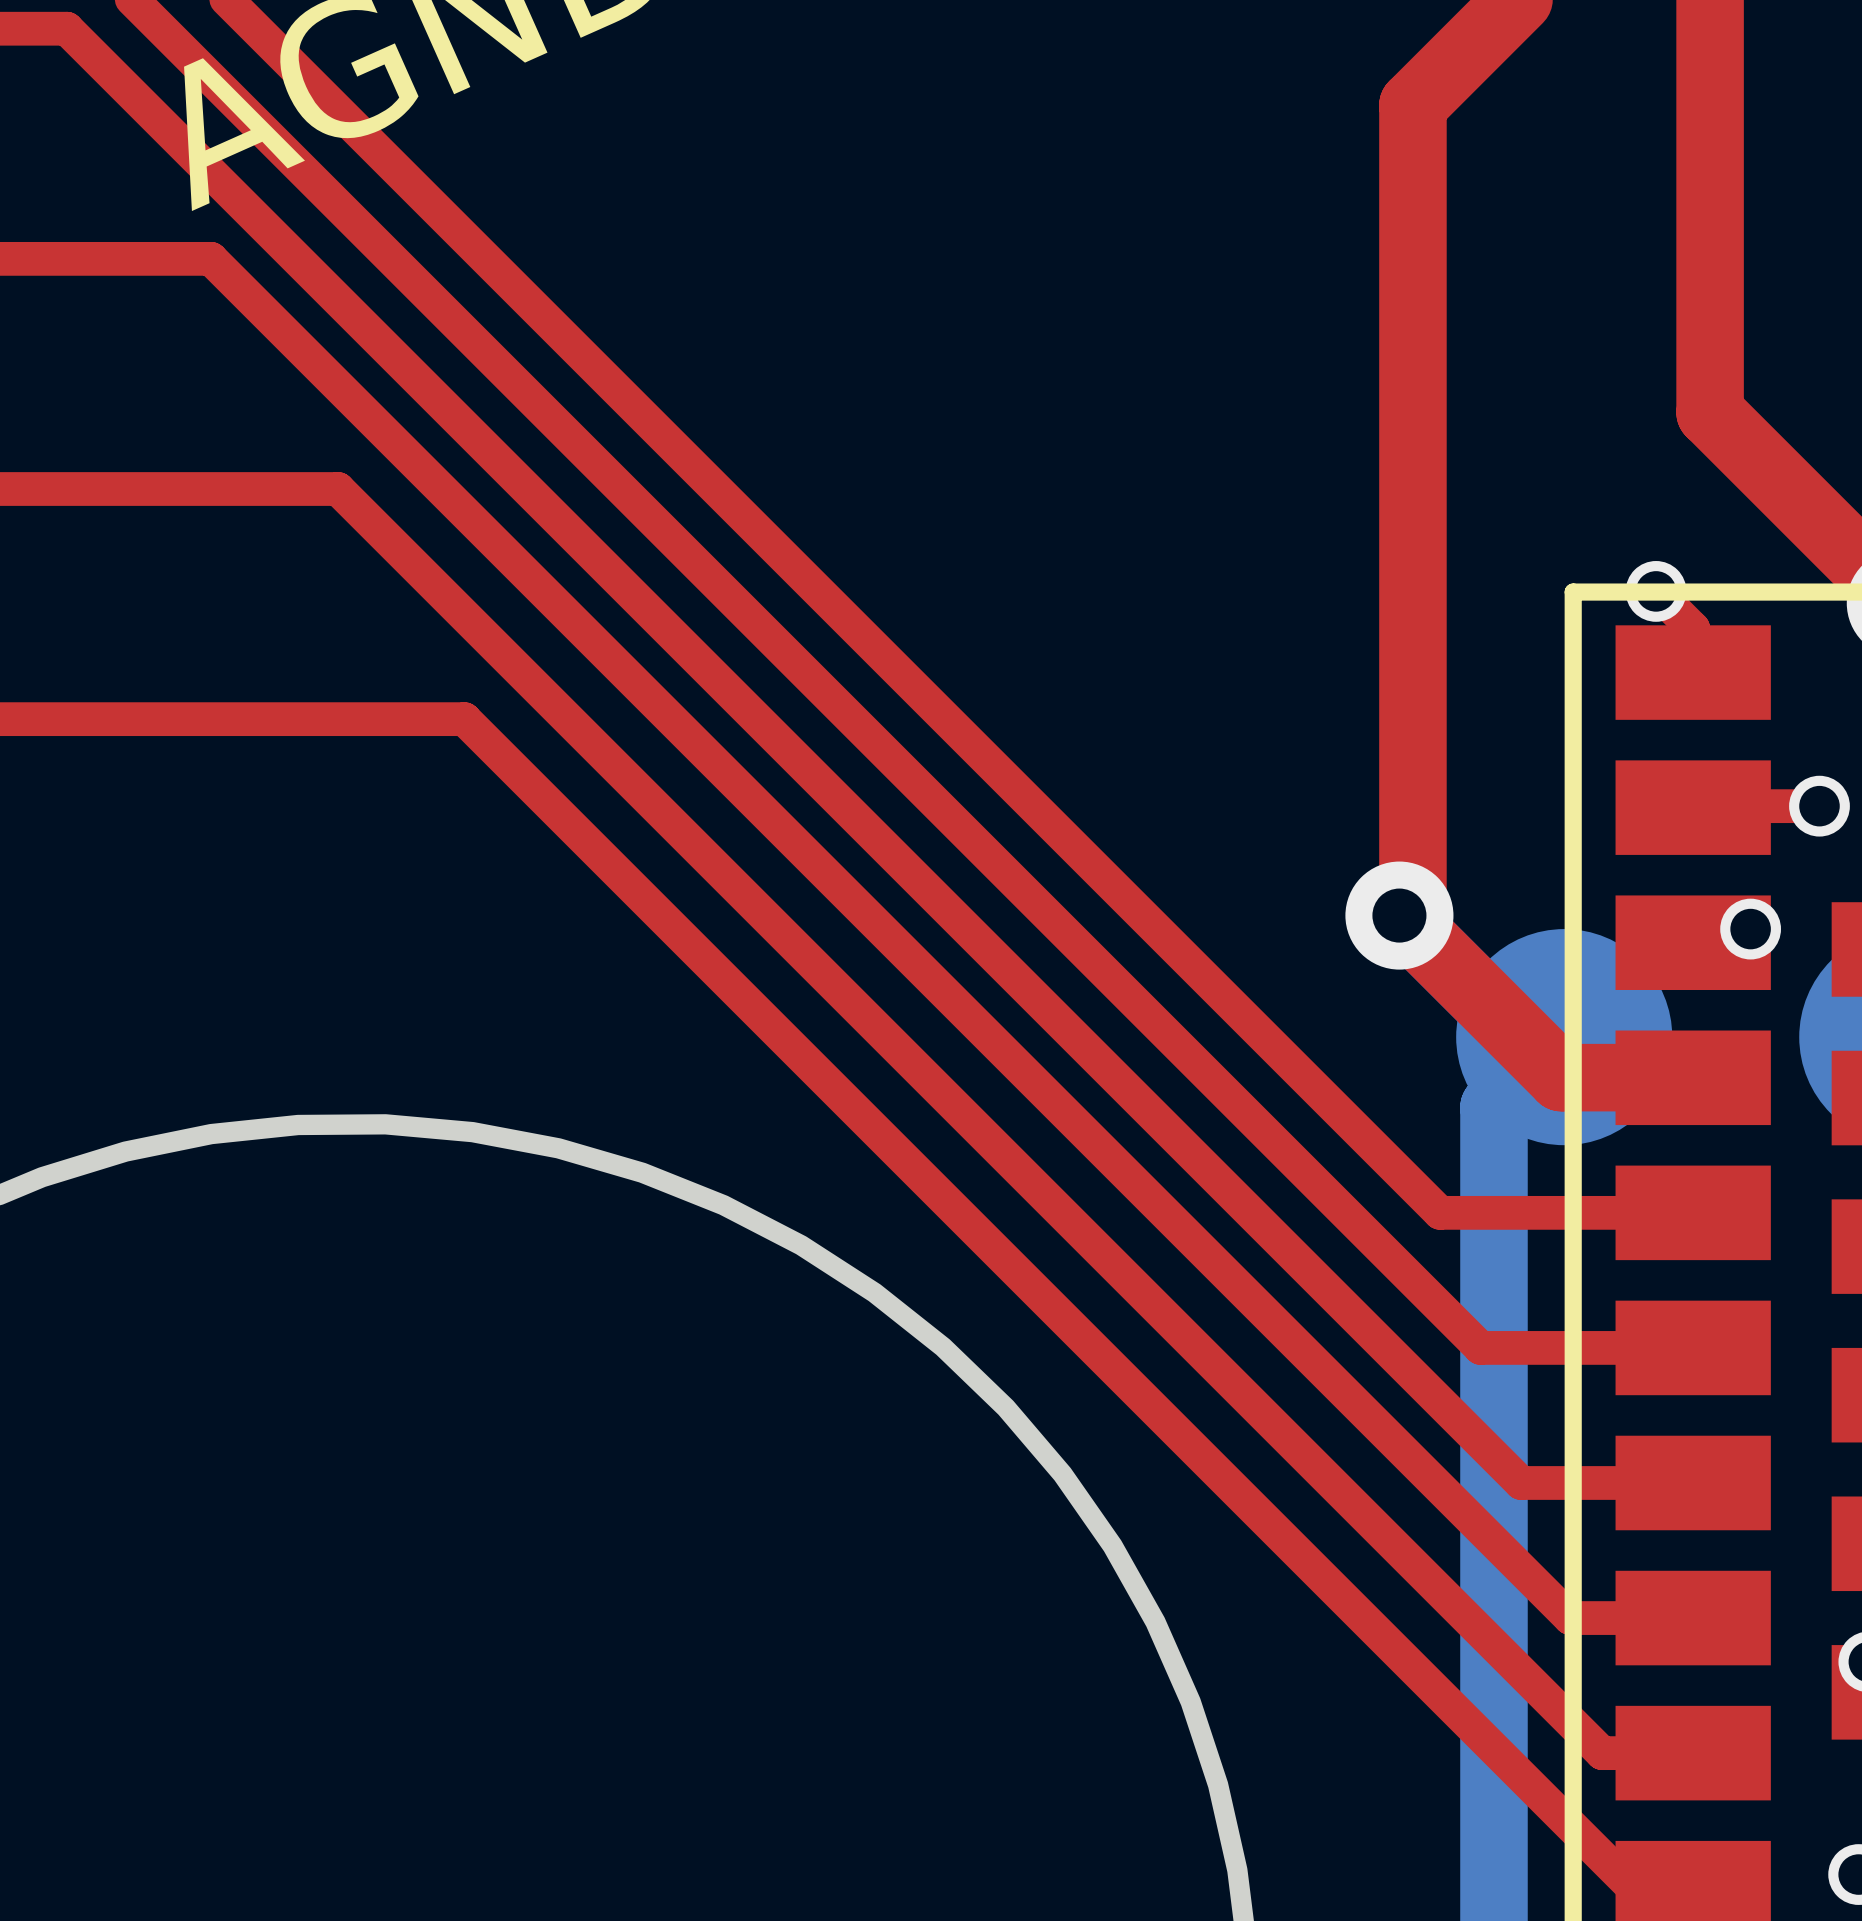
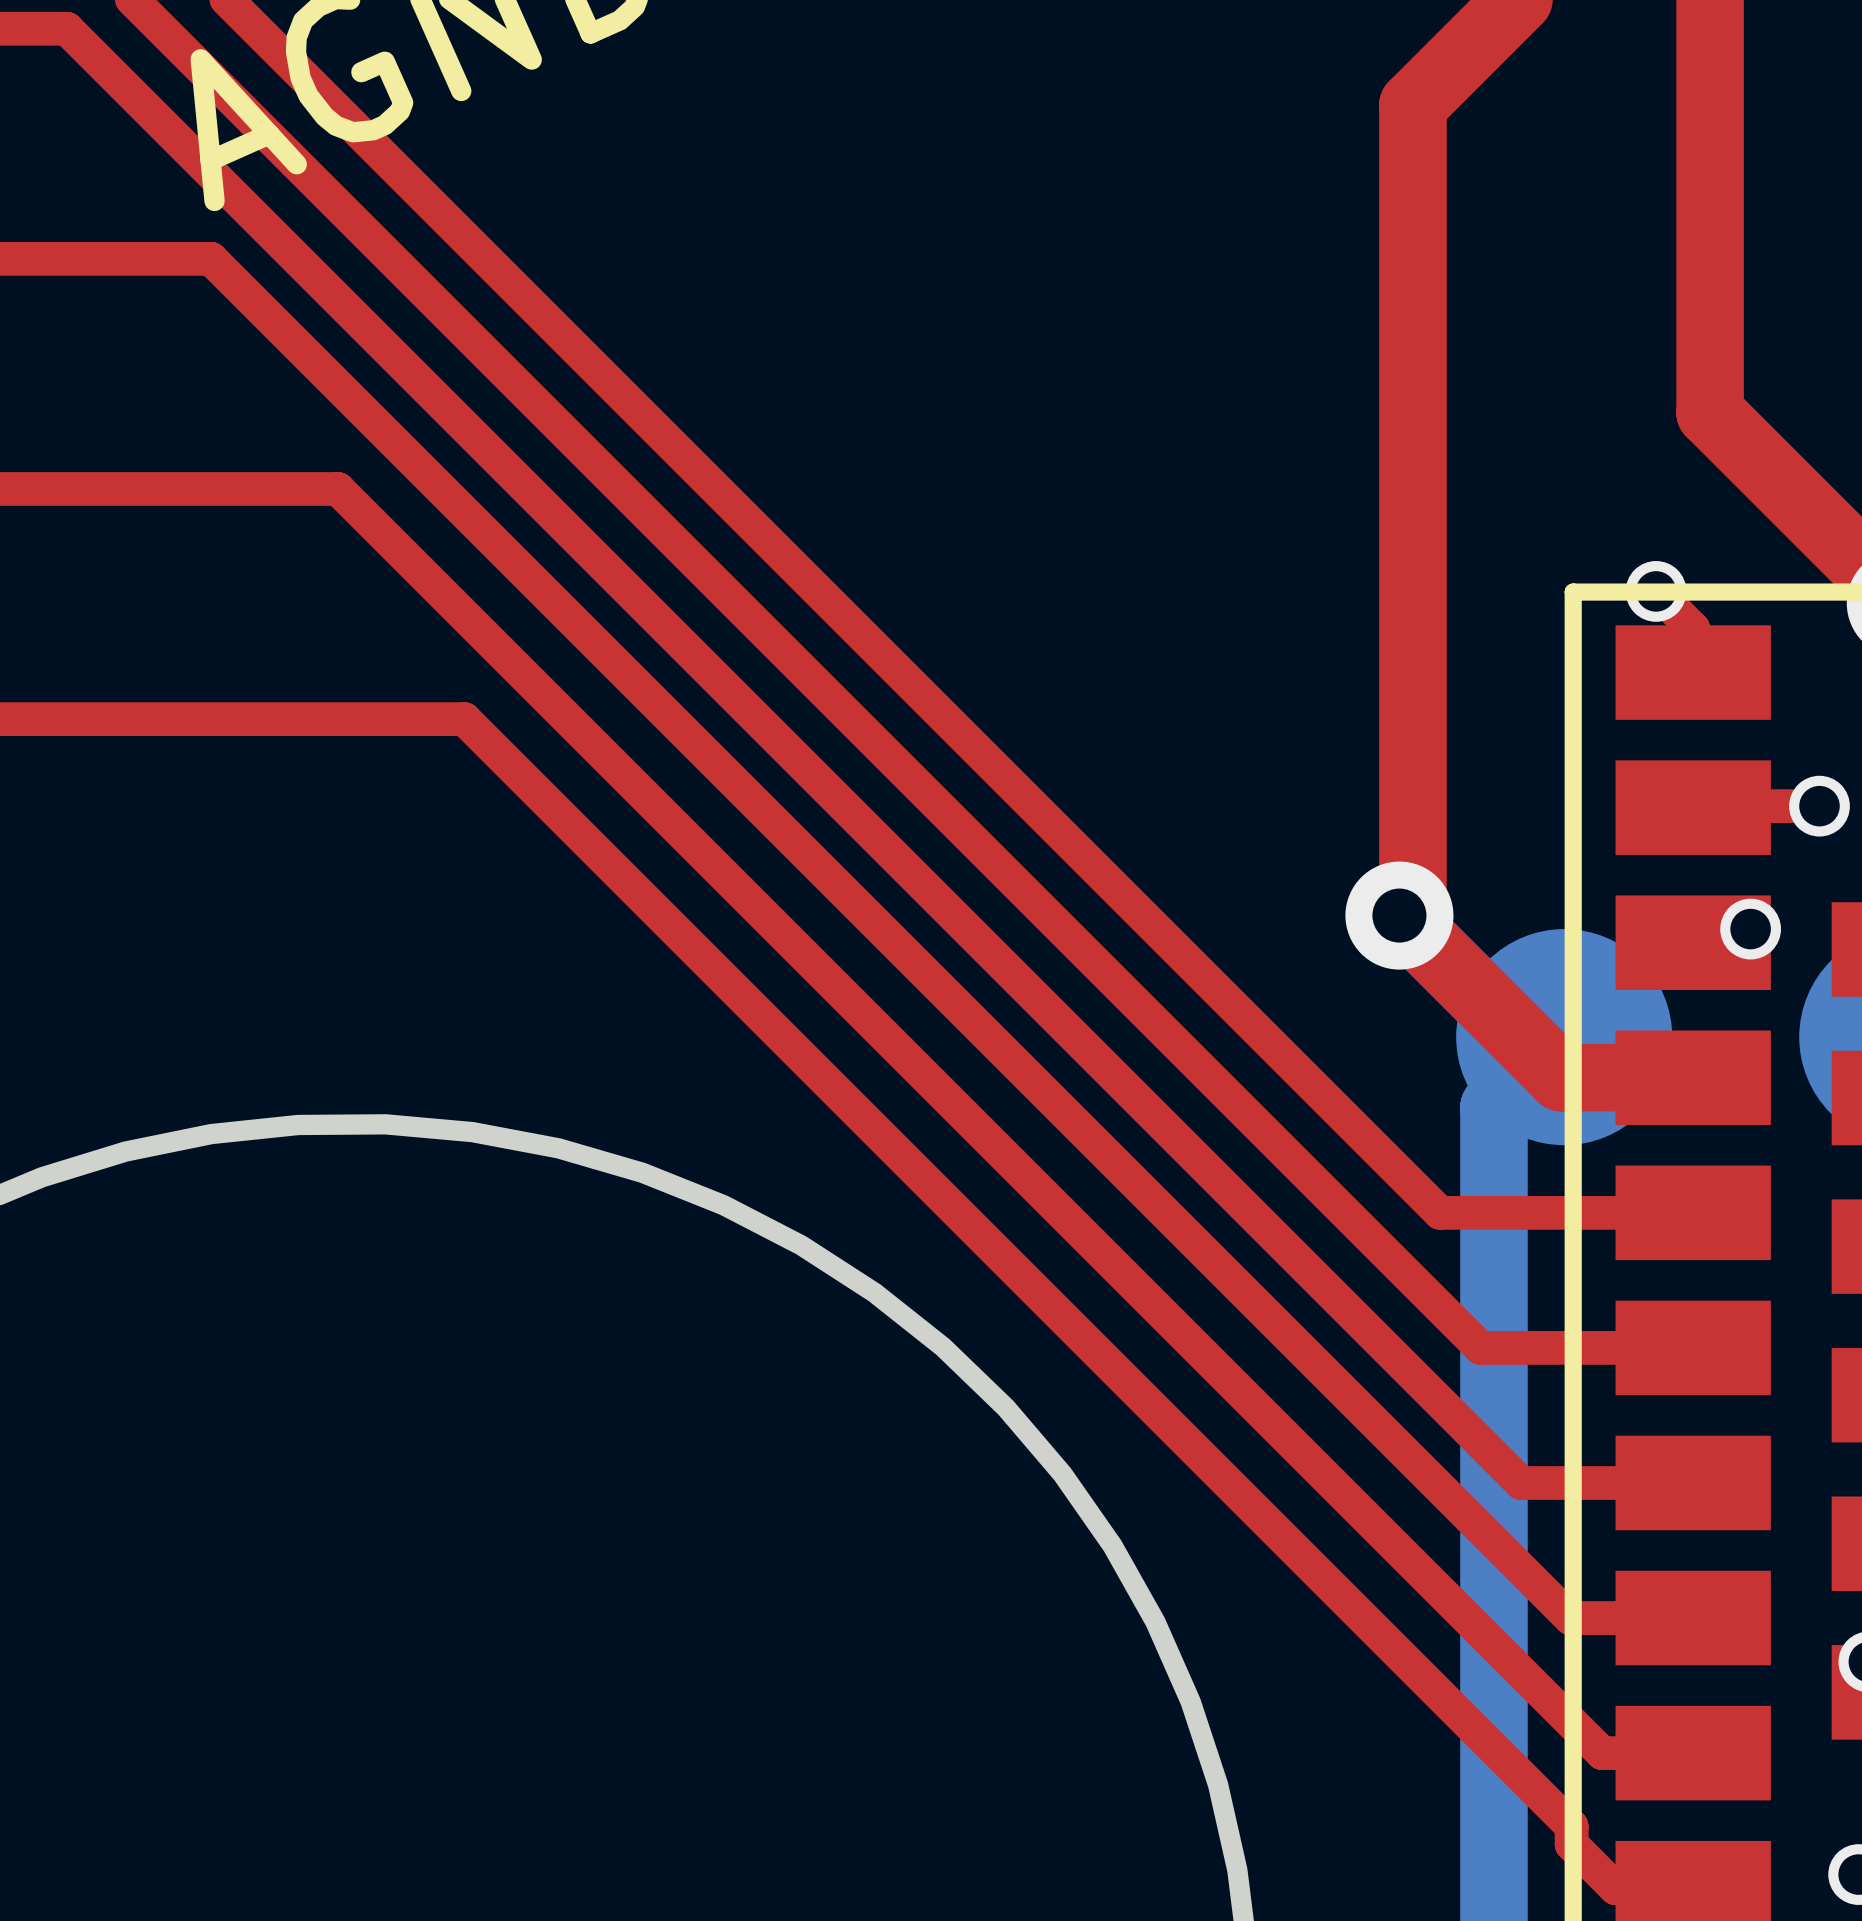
top track: (1571, 1826) (1633, 1888) -> (1571, 1826) (1571, 1844) (1615, 1888) (1633, 1888)

